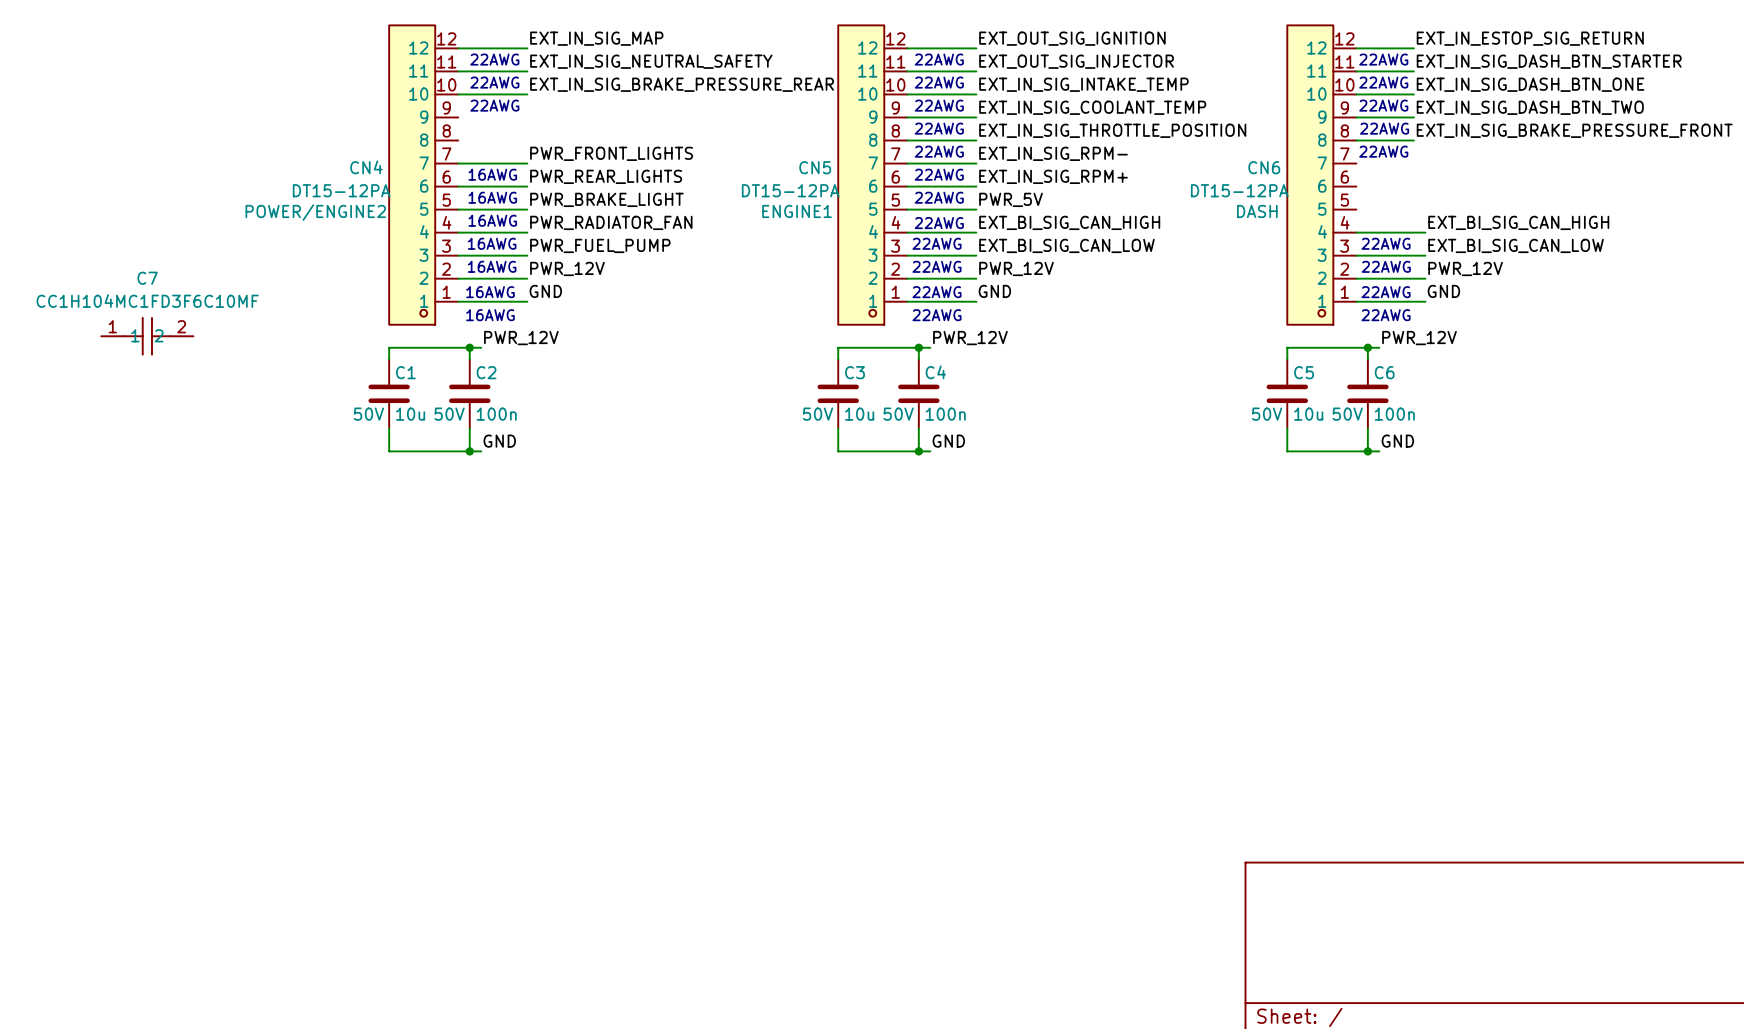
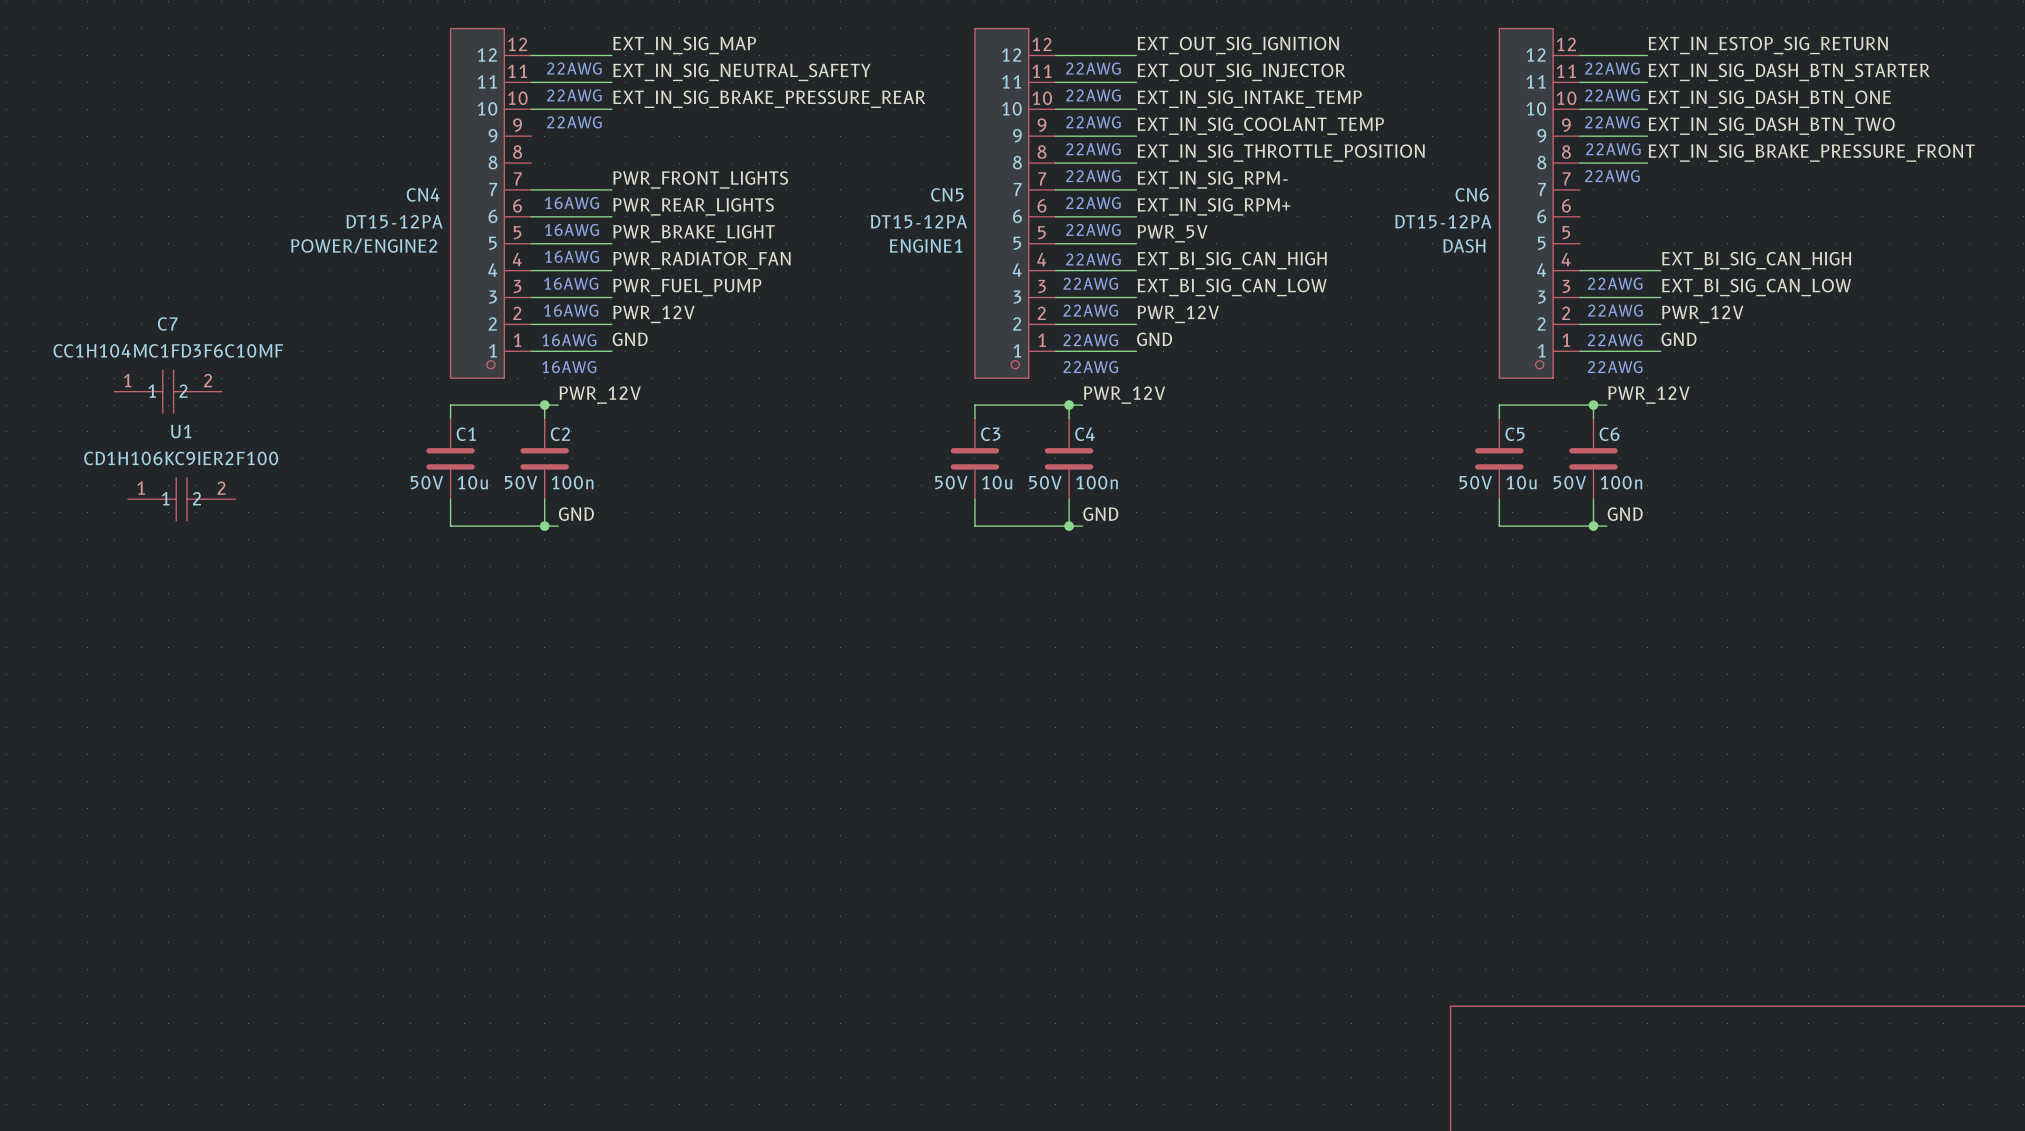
U1: none -> CD1H106KC9IER2F100 (181, 499)

